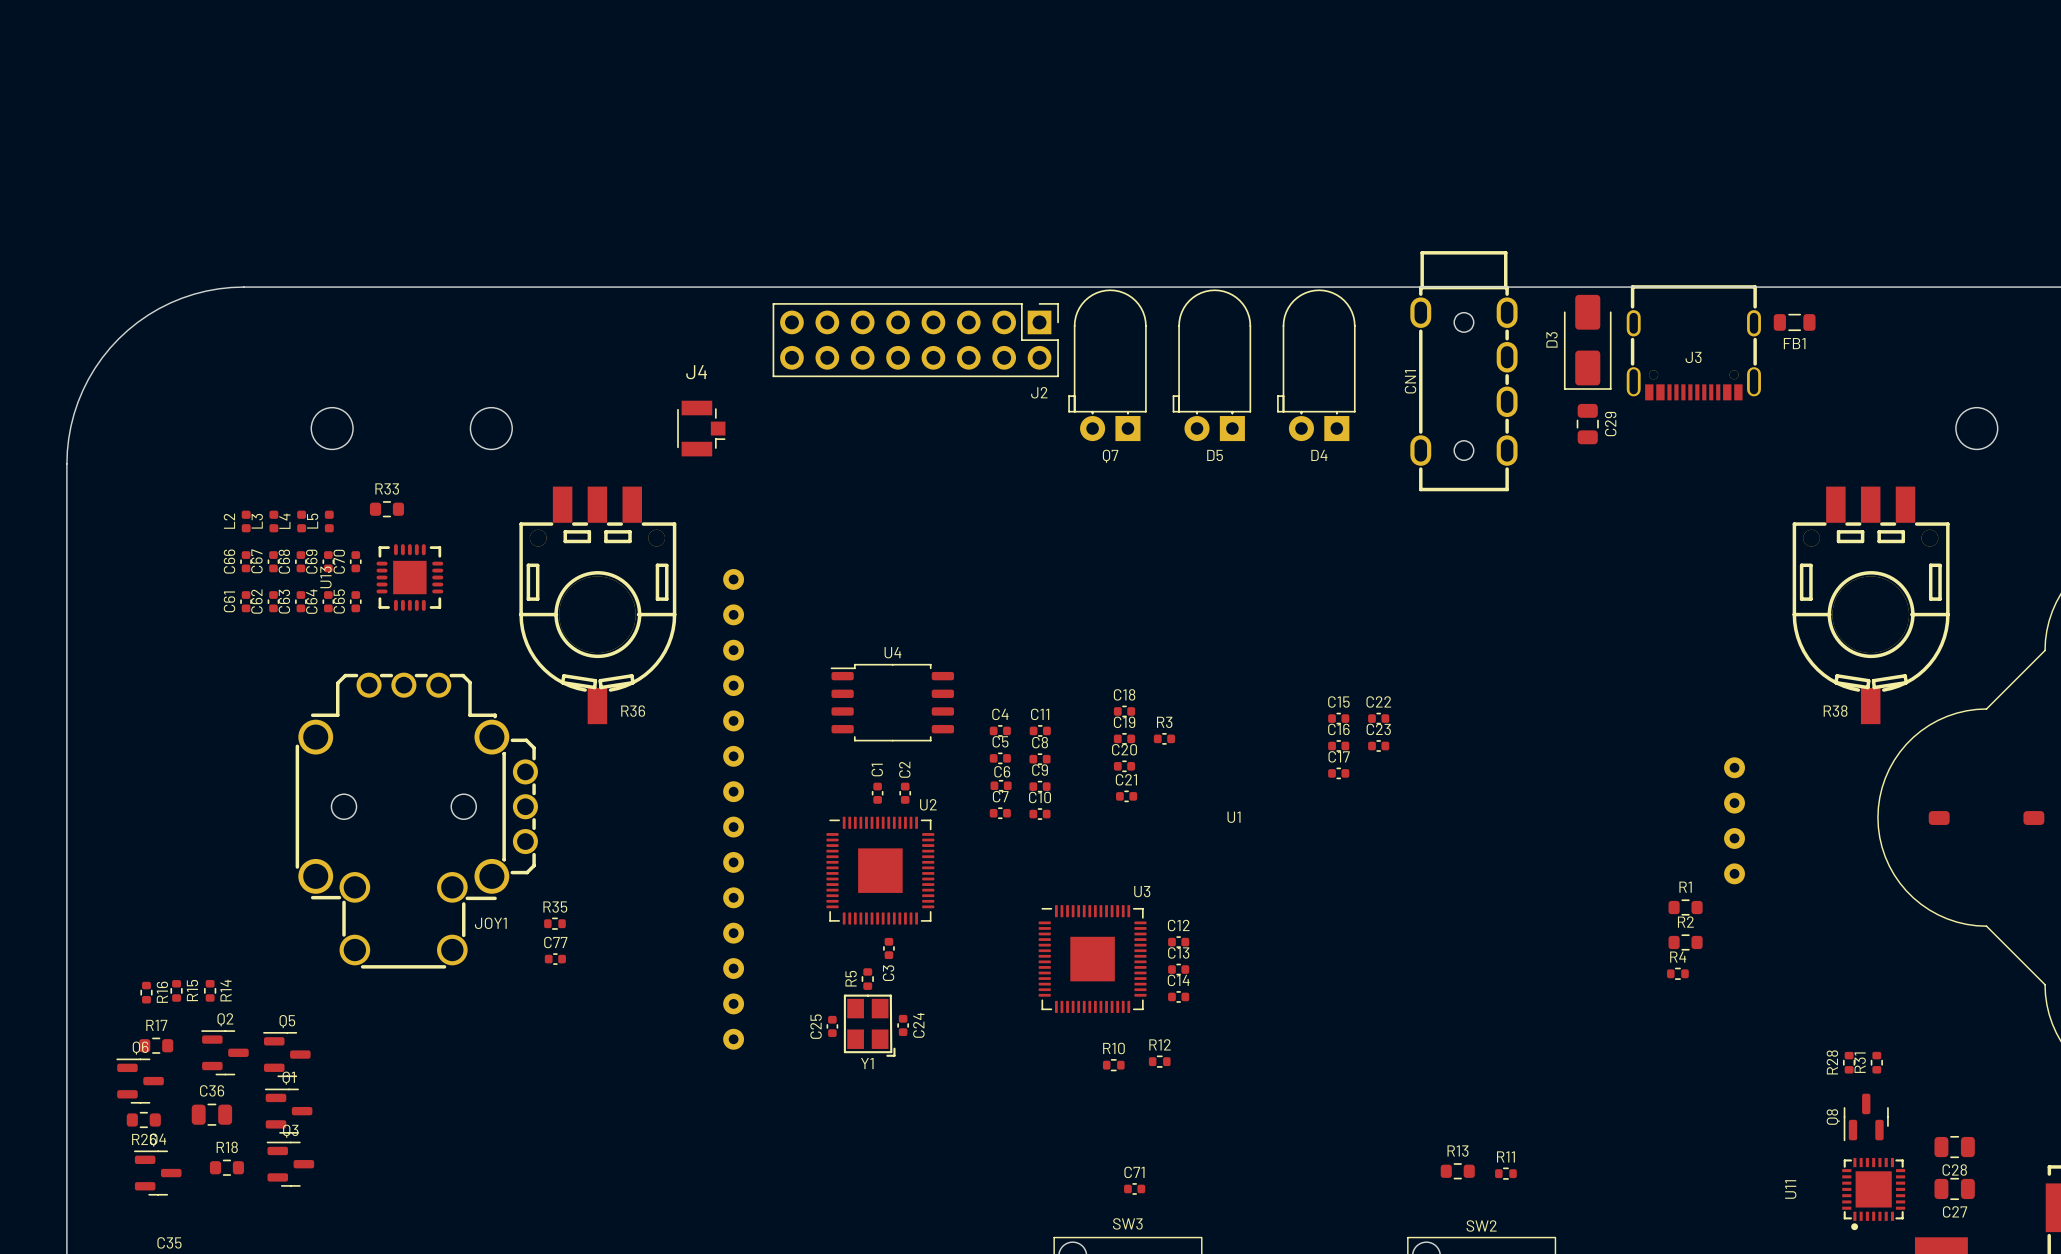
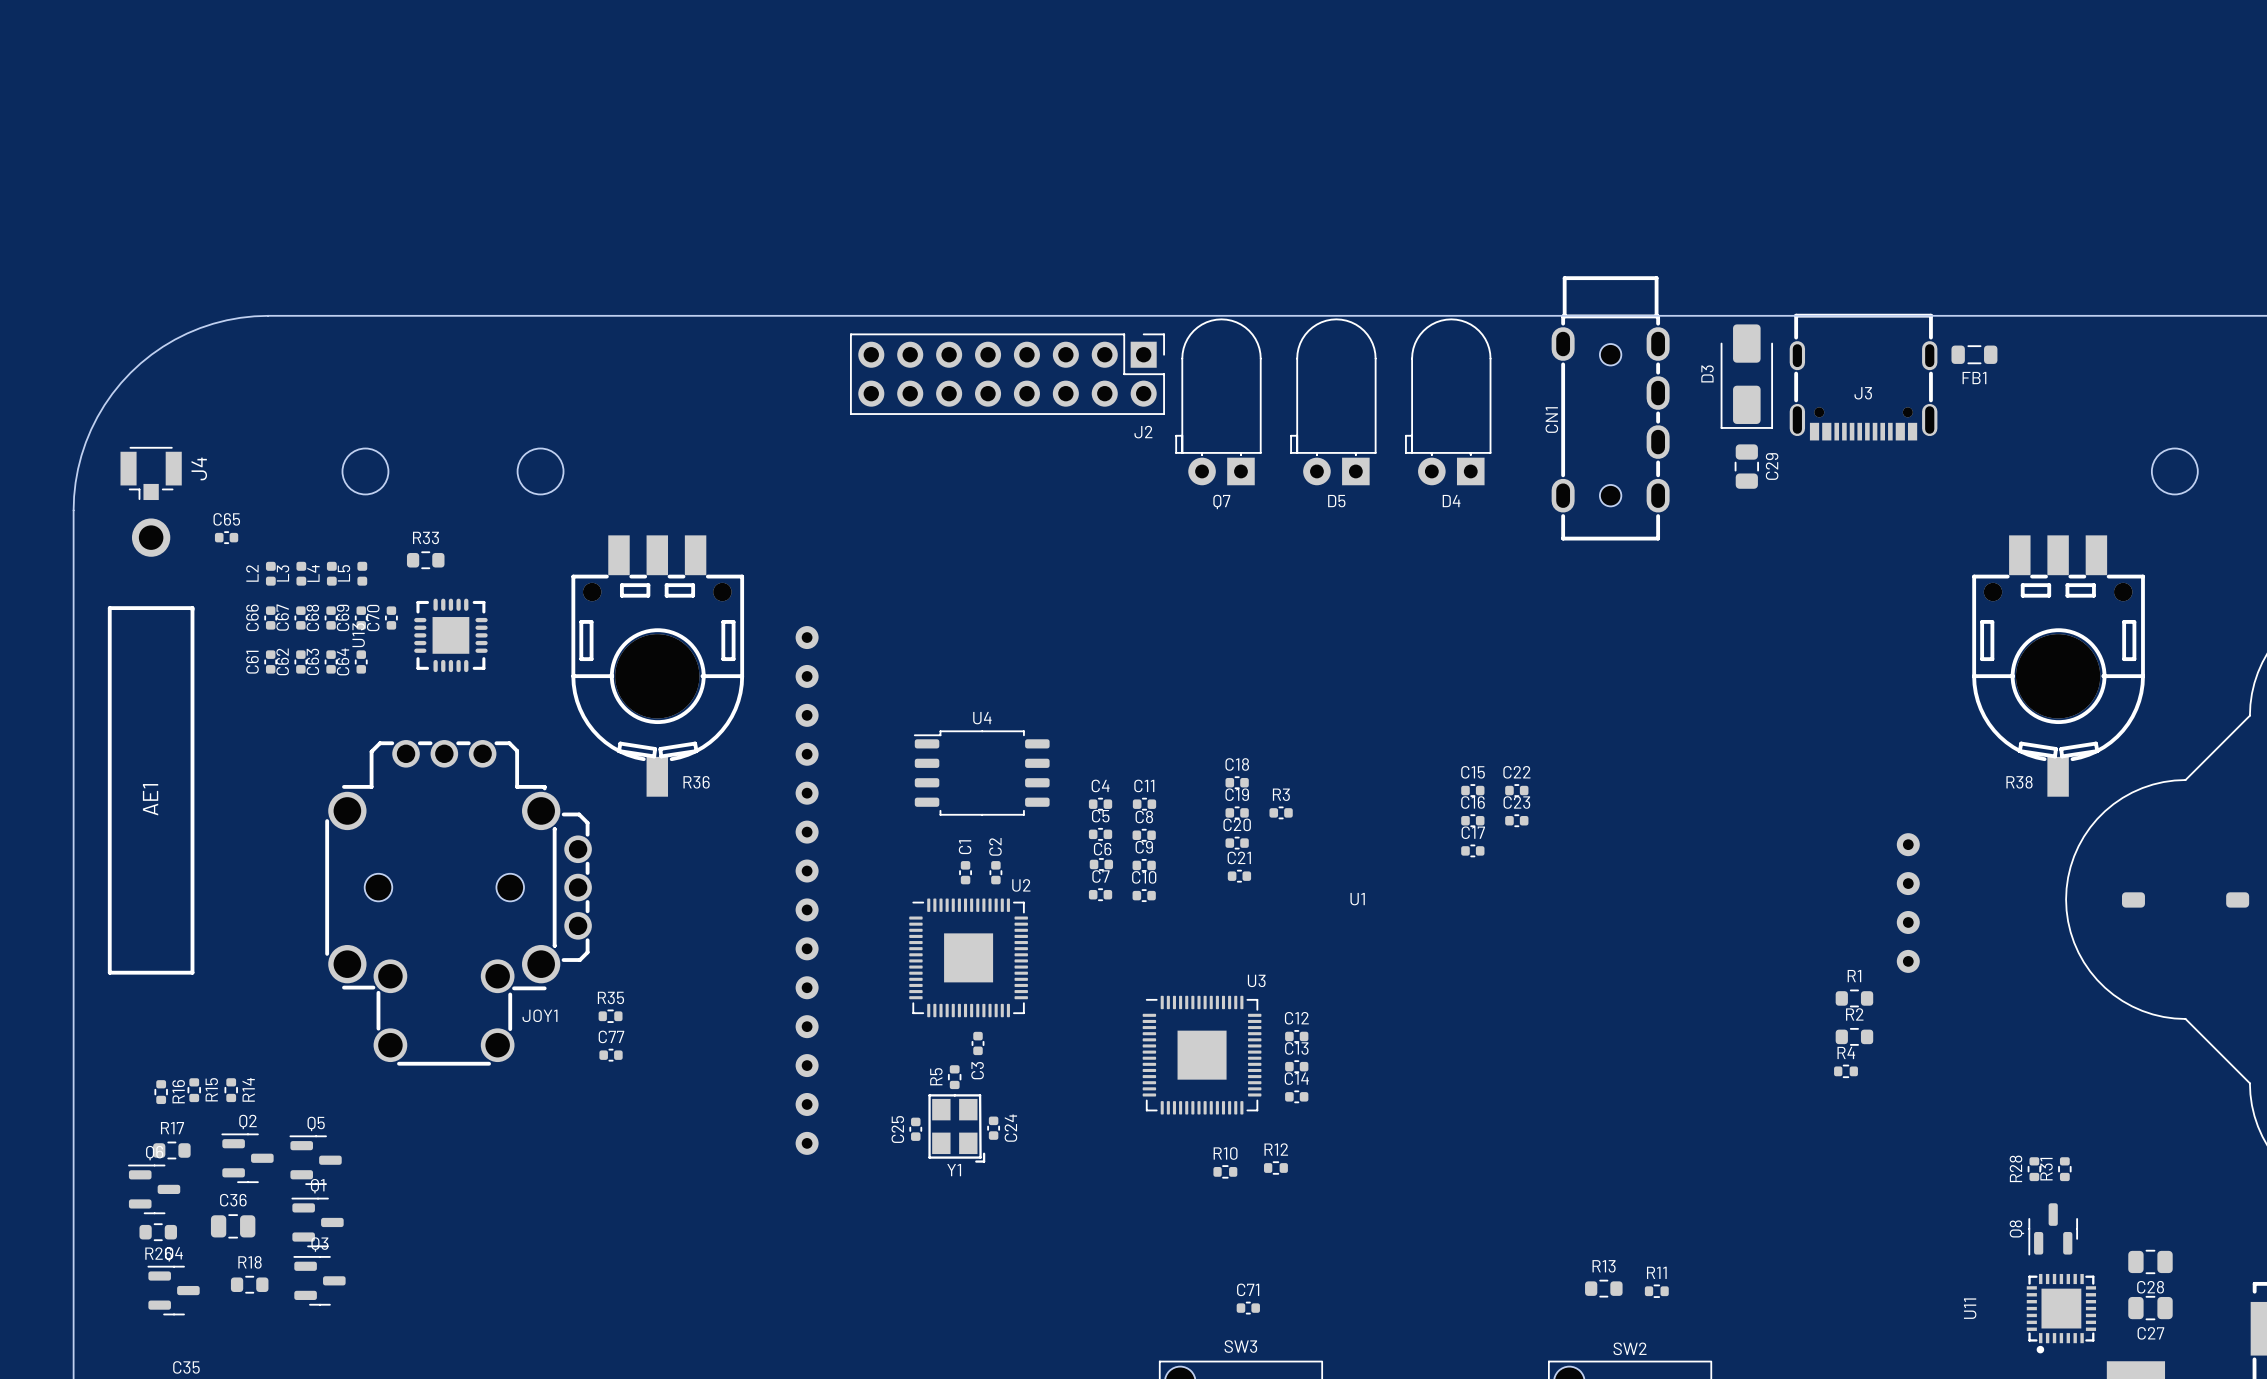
J4 rotation: 0° (701, 428) -> 90° clockwise (151, 473)
J4 position: (701, 428) -> (151, 473)
C65 rotation: 0° (355, 601) -> 90° clockwise (226, 537)
C65 position: (355, 601) -> (226, 537)
AE1: none -> (151, 746)

